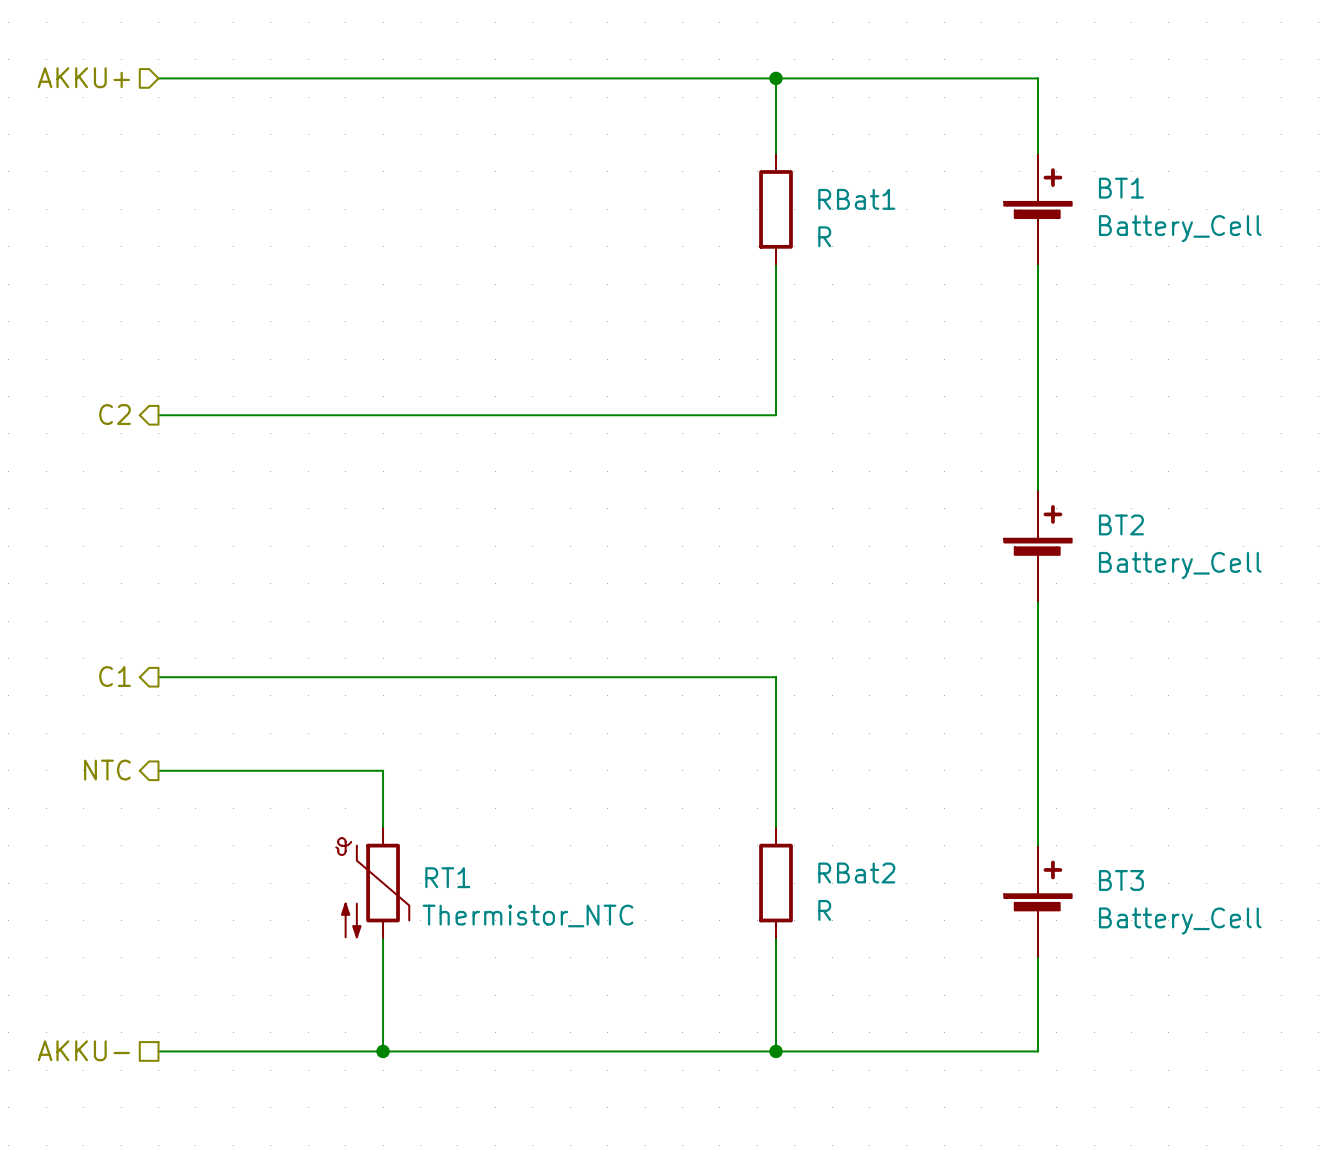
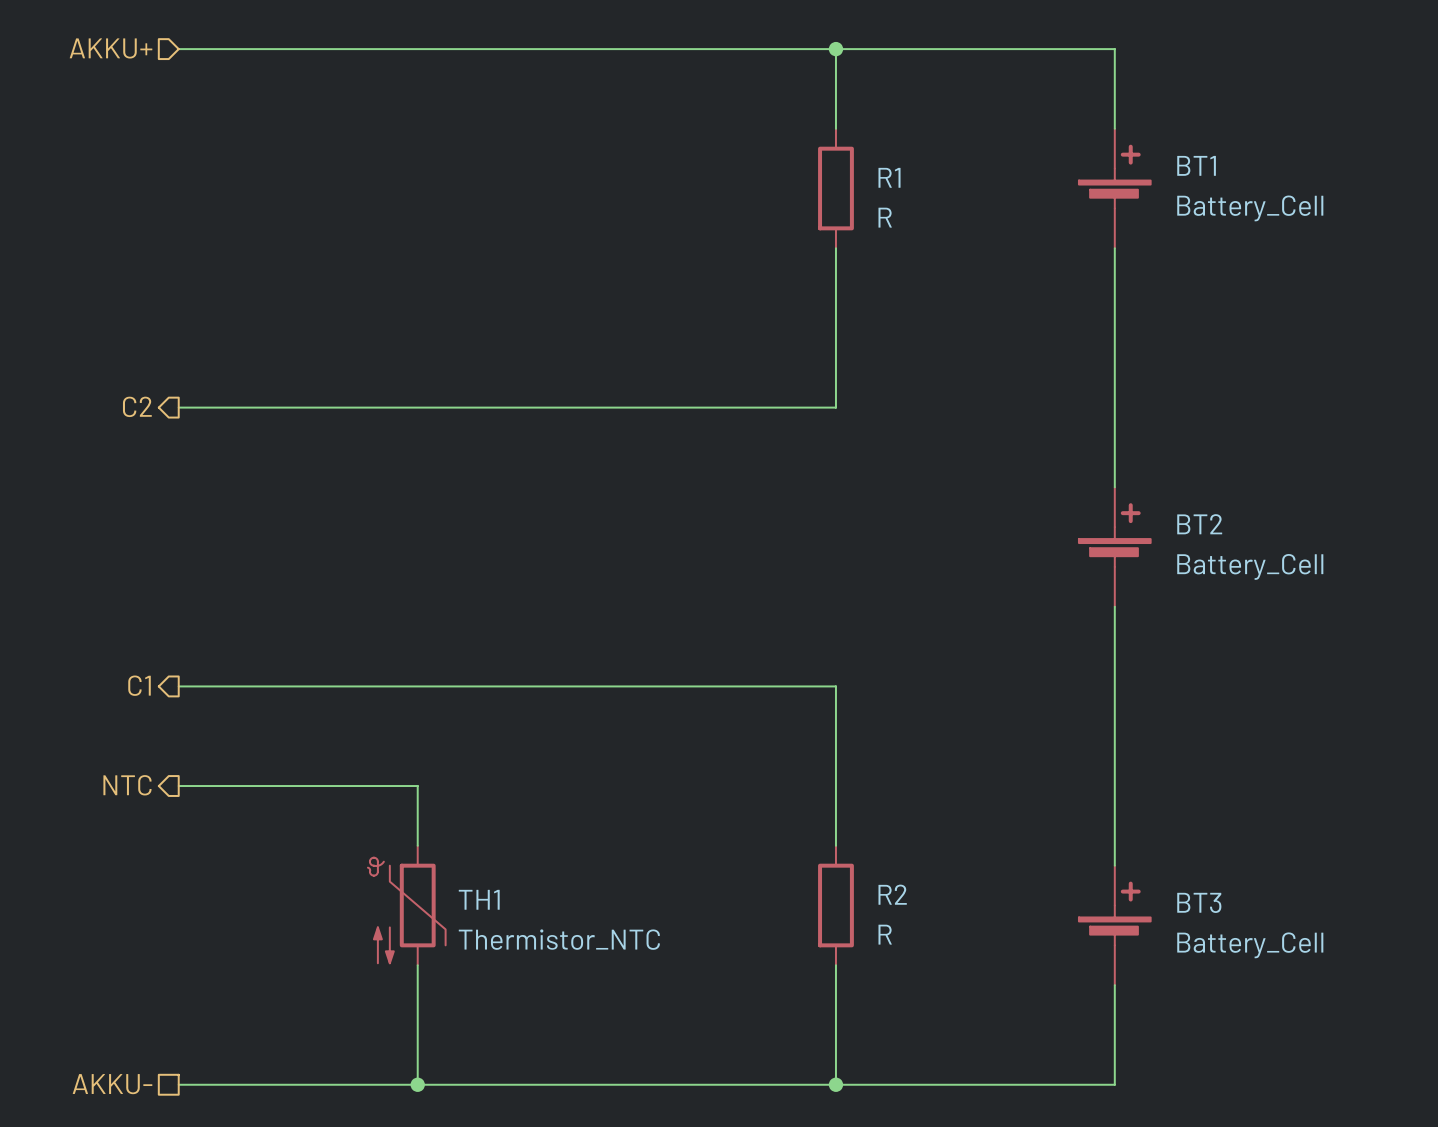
RBat1 name: RBat1 (856, 199) -> R1 (889, 177)
RBat2 name: RBat2 (856, 873) -> R2 (892, 894)
RT1 name: RT1 (447, 877) -> TH1 (479, 899)

